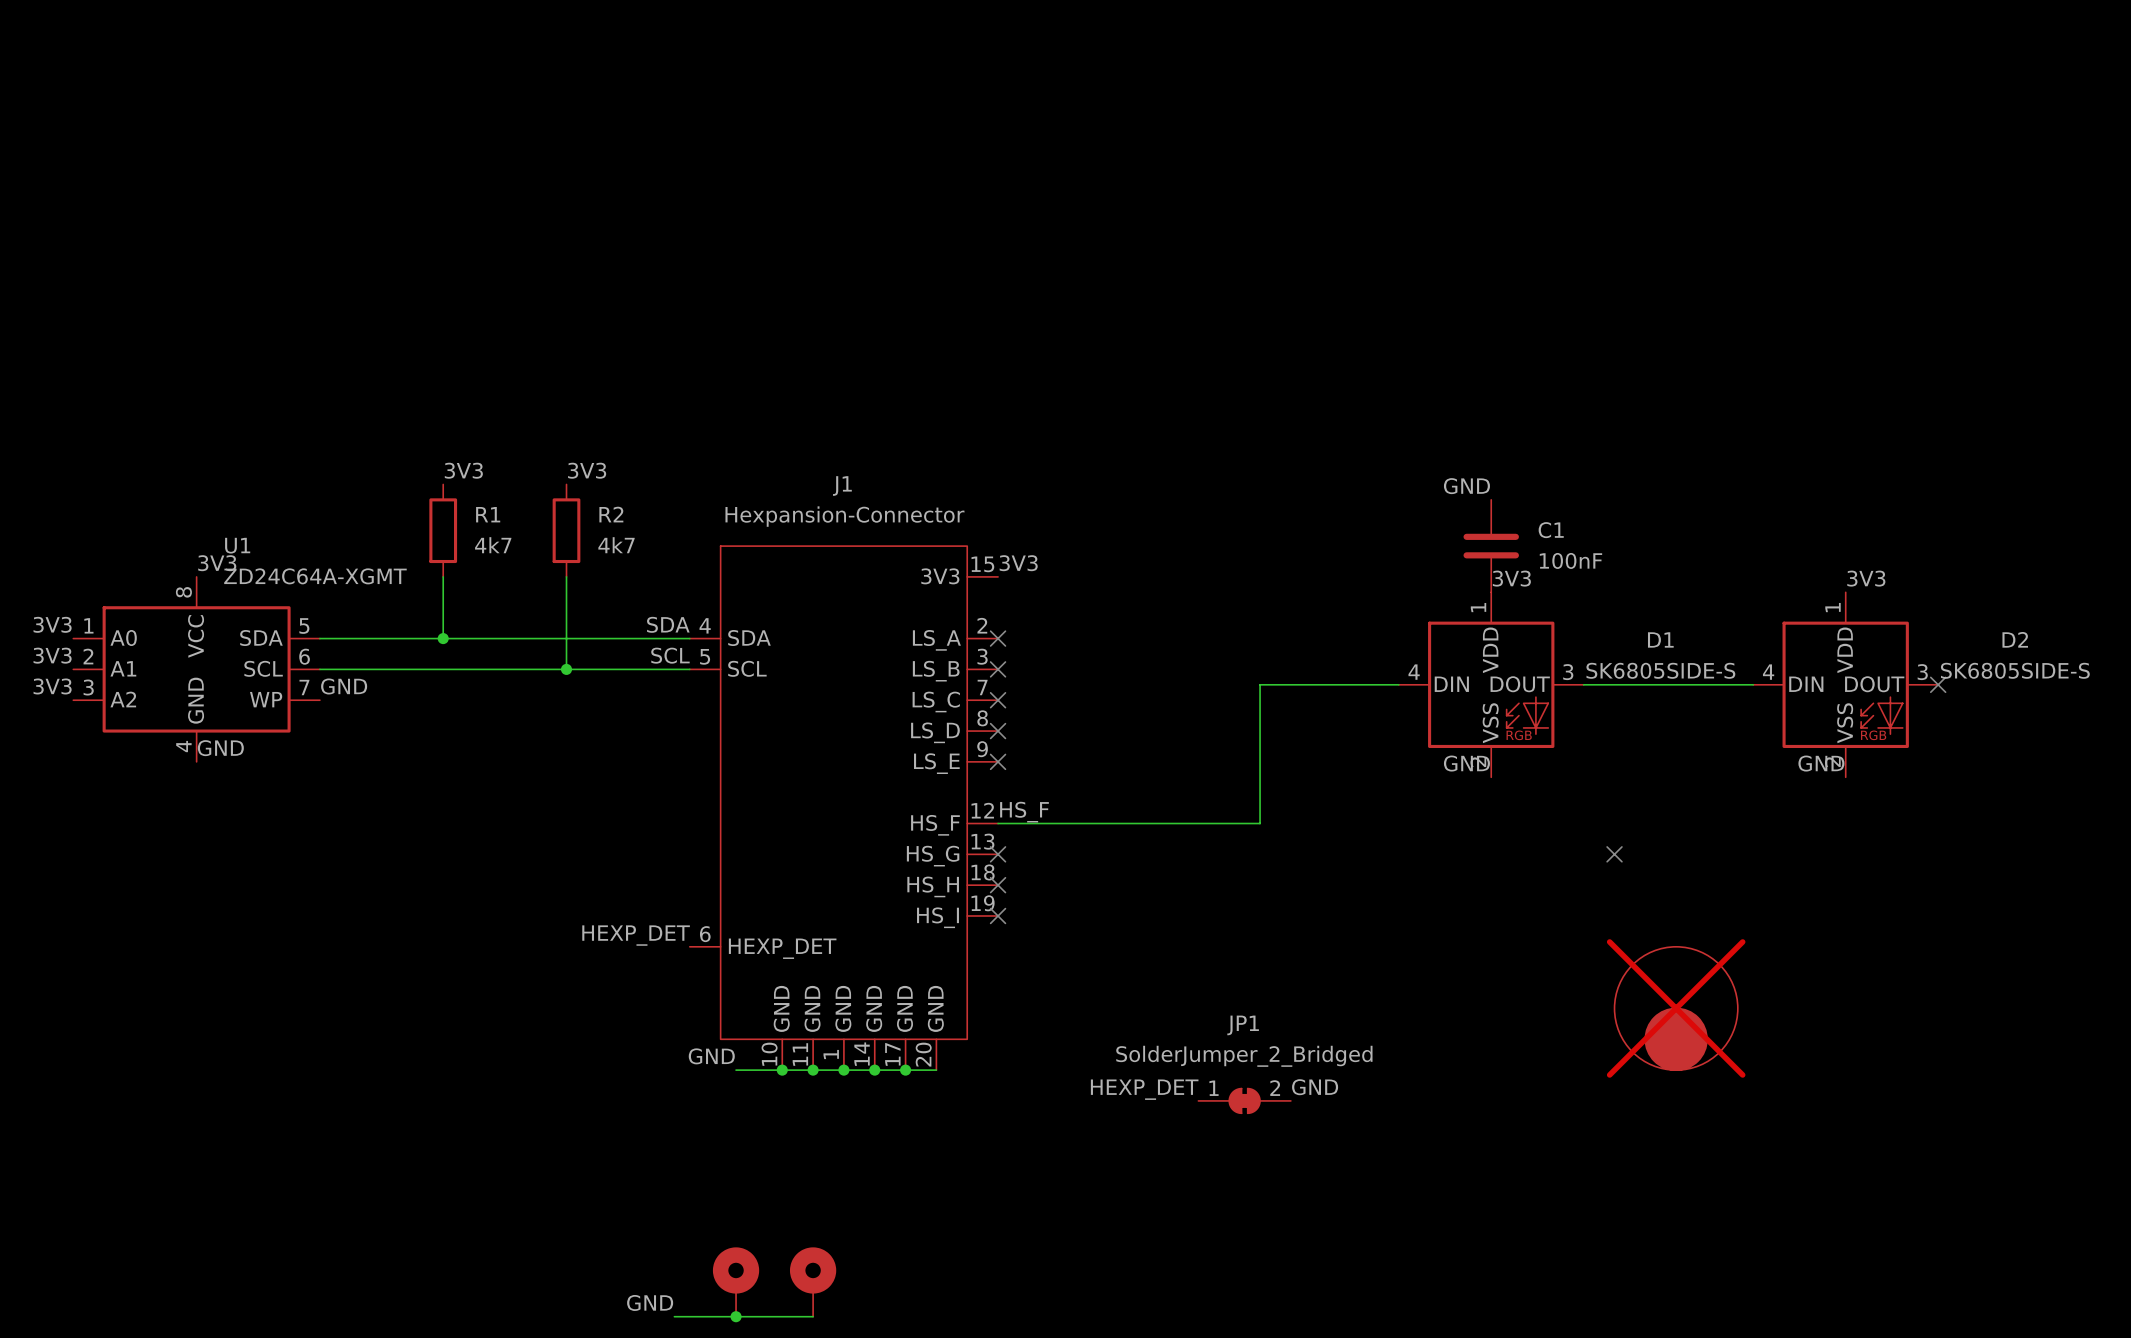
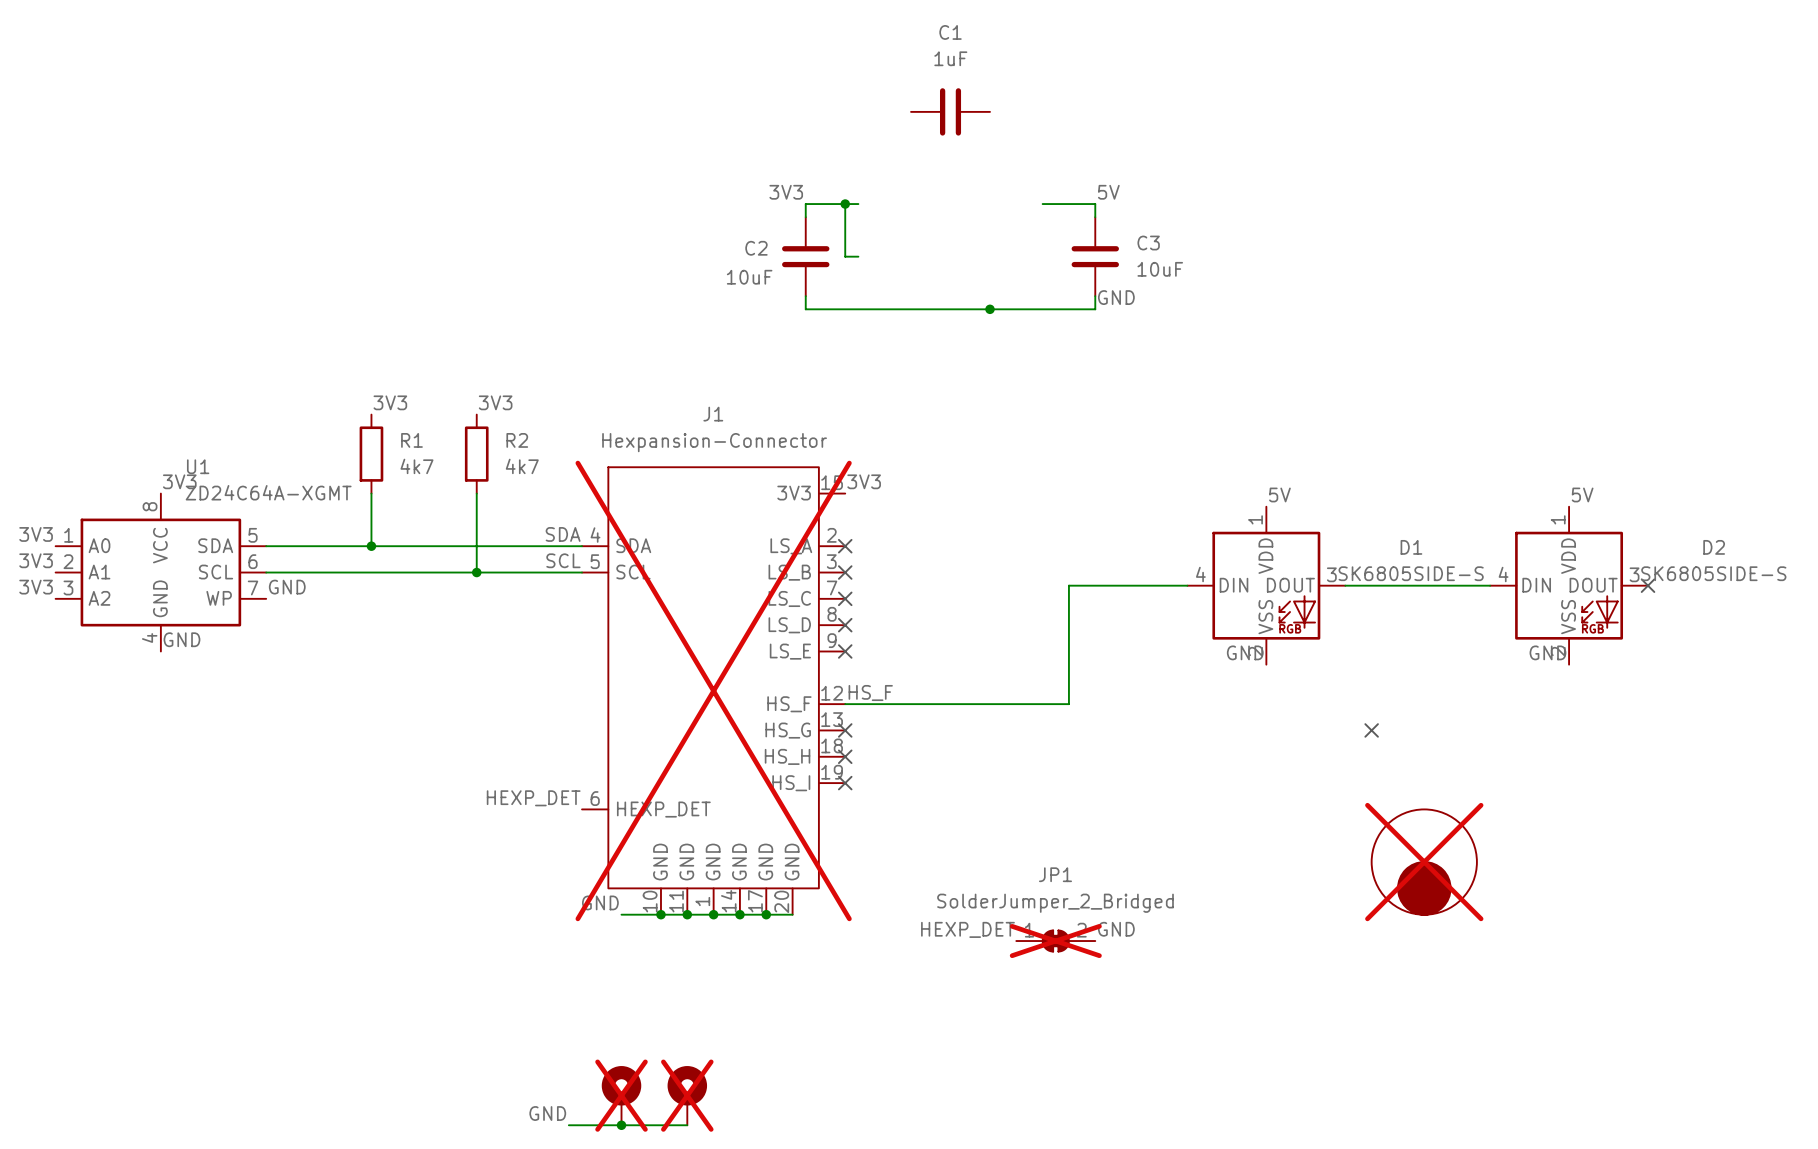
label: none -> 3V3 (786, 192)
label: none -> 5V (1108, 192)
wire: none -> (845, 204) (845, 256) (858, 256)
junction: none -> (845, 204)
wire: none -> (858, 204) (805, 204) (805, 217)
wire: none -> (1042, 204) (1095, 204) (1095, 217)
C2: none -> 10uF (805, 256)
C3: none -> 10uF (1095, 256)
wire: none -> (805, 296) (805, 309) (1095, 309) (1095, 296)
junction: none -> (990, 309)
label position: GND (1466, 486) -> GND (1116, 297)
C1 name position: C1 (1551, 530) -> C1 (950, 32)
C1 rotation: 0° (1491, 546) -> 90° clockwise (950, 111)
C1 position: (1491, 546) -> (950, 111)
C1 value: 100nF (1570, 560) -> 1uF (950, 58)
label: 3V3 (1511, 578) -> 5V (1279, 494)
label: 3V3 (1866, 578) -> 5V (1582, 494)
J1 do-not-place cross: none -> (713, 690)
JP1 do-not-place cross: none -> (1055, 941)
part do-not-place cross: none -> (621, 1095)
part do-not-place cross: none -> (687, 1095)

